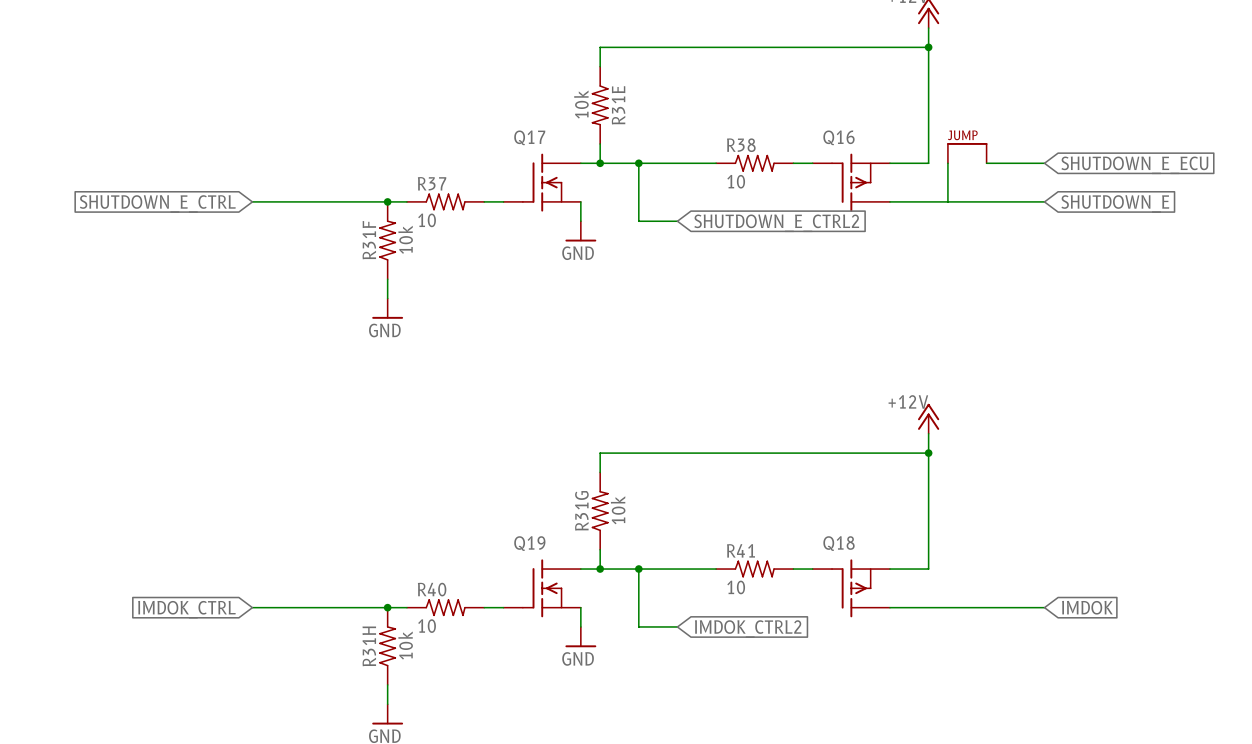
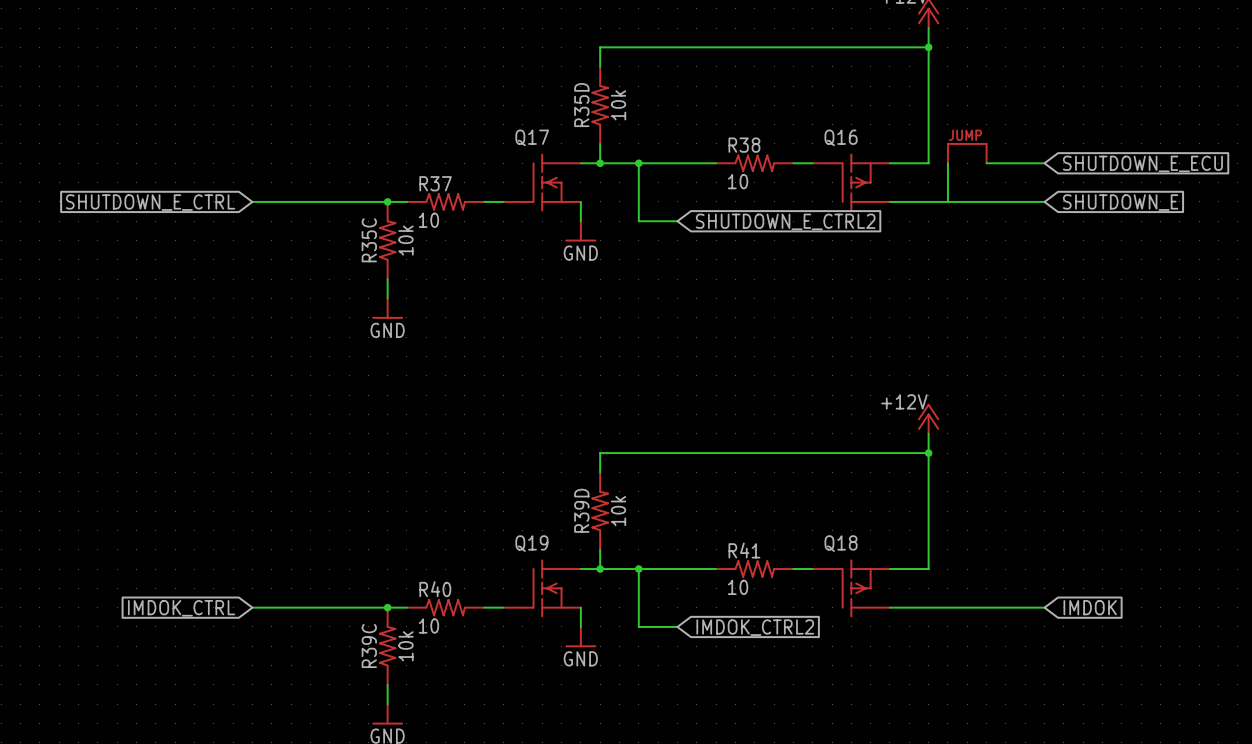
R31E: 10k (600, 105) -> none
R35D: none -> 10k (600, 105)
R31F name: R31F (369, 240) -> R35C (369, 240)
R31G name: R31G (581, 510) -> R39D (581, 510)
R31H name: R31H (369, 646) -> R39C (369, 646)

